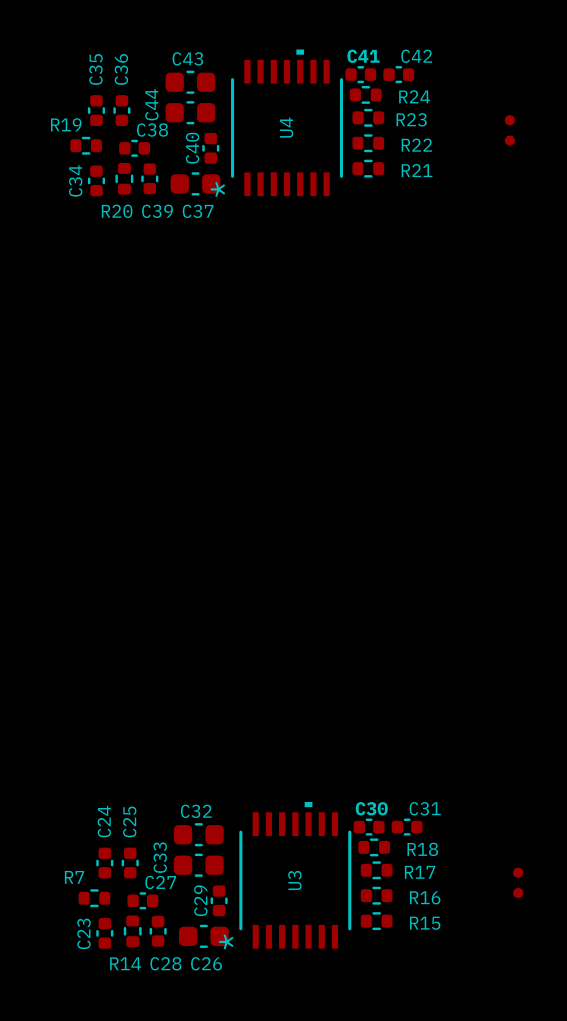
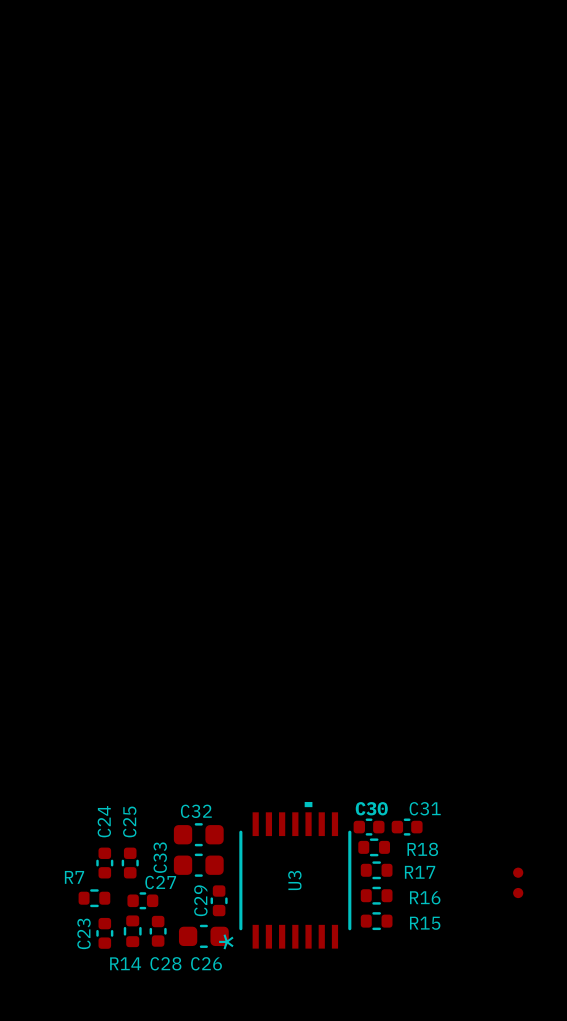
C41: (360, 74) -> none
C42: (398, 74) -> none
C43: (190, 82) -> none
R24: (365, 94) -> none
C35: (96, 110) -> none
C36: (121, 110) -> none
C44: (190, 112) -> none
R23: (368, 117) -> none
U4: (287, 122) -> none
part: (509, 130) -> none
R22: (368, 143) -> none
R19: (86, 145) -> none
C38: (134, 148) -> none
C40: (210, 148) -> none
R21: (368, 168) -> none
R20: (124, 178) -> none
C39: (149, 178) -> none
C34: (96, 180) -> none
C37: (195, 183) -> none

